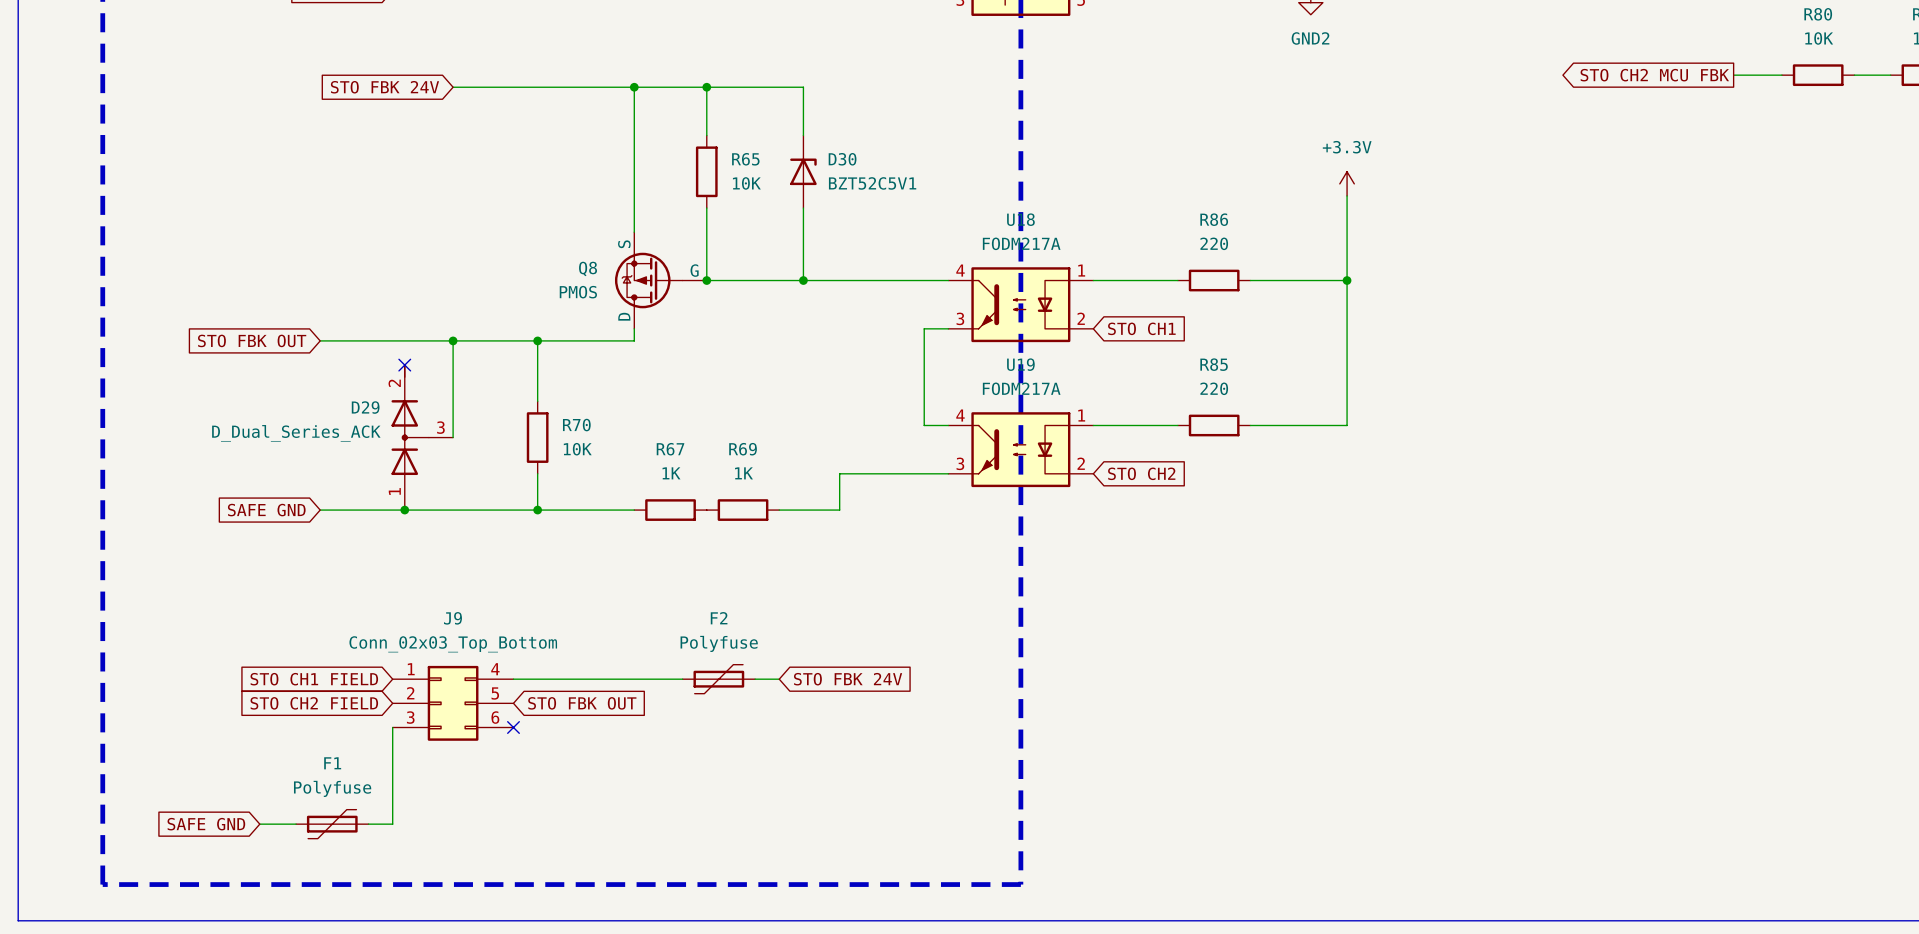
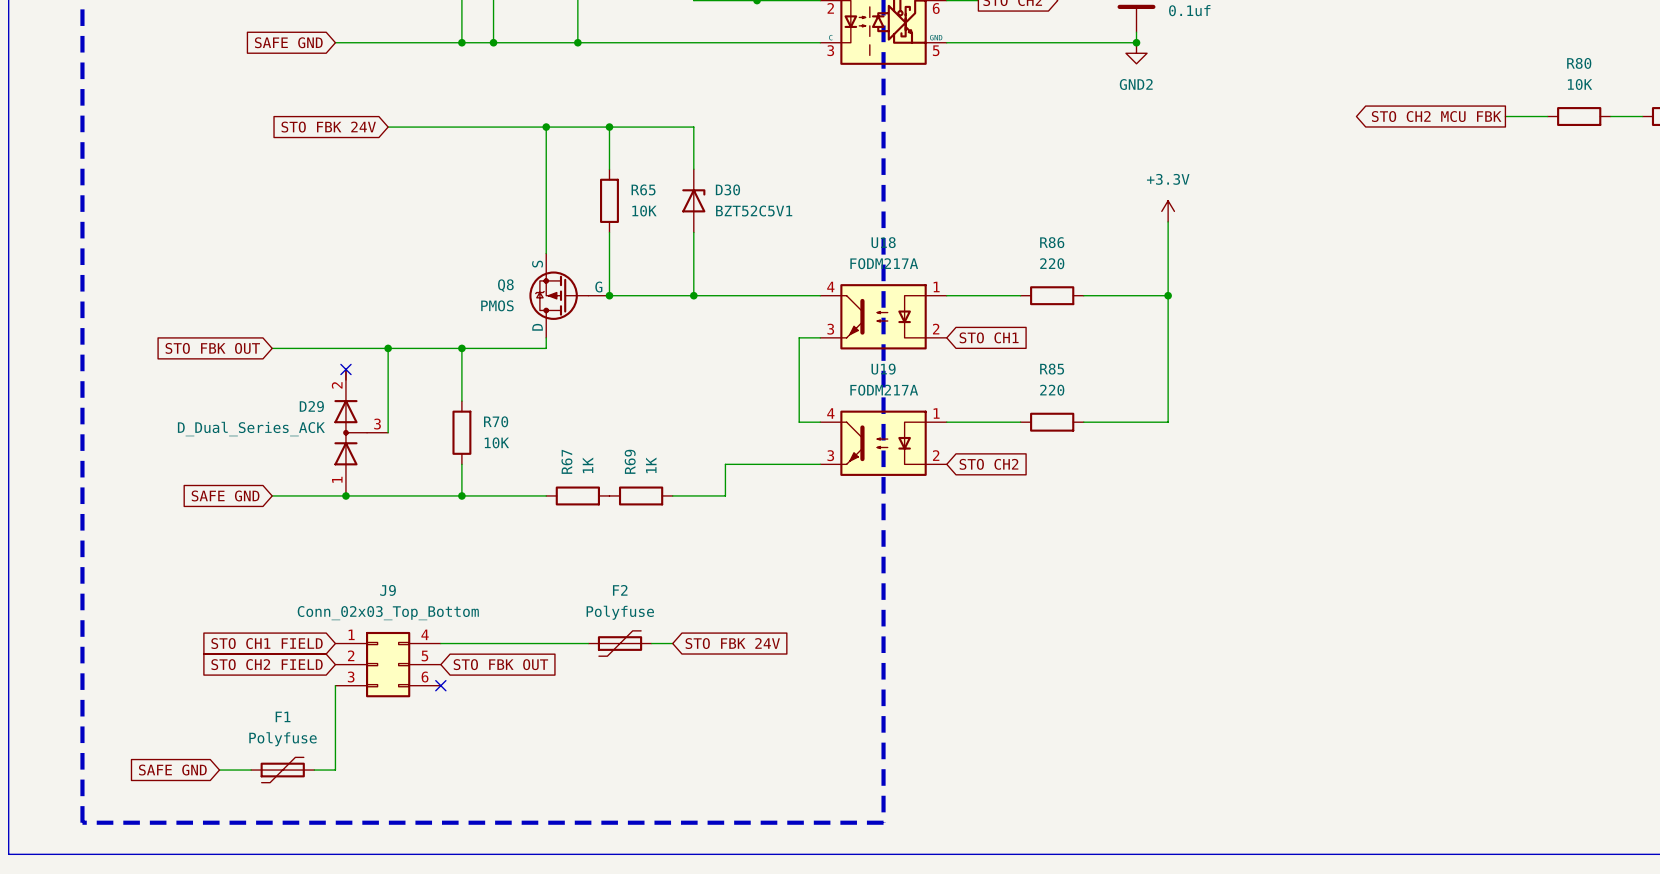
R67 name rotation: 0° (670, 449) -> 90° counterclockwise (566, 461)
R69 name rotation: 0° (743, 449) -> 90° counterclockwise (630, 461)
R67 value rotation: 0° (671, 473) -> 90° counterclockwise (588, 465)
R69 value rotation: 0° (743, 473) -> 90° counterclockwise (651, 465)

